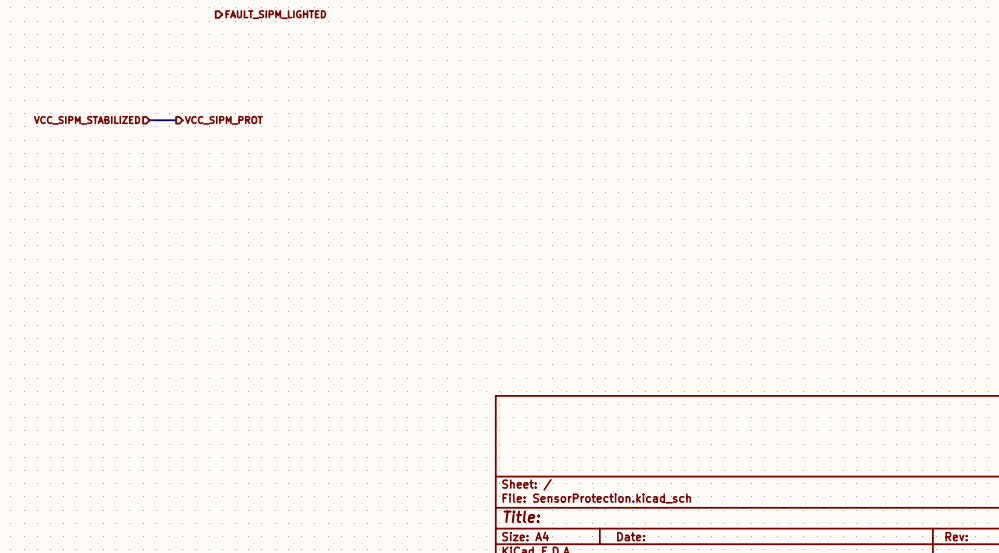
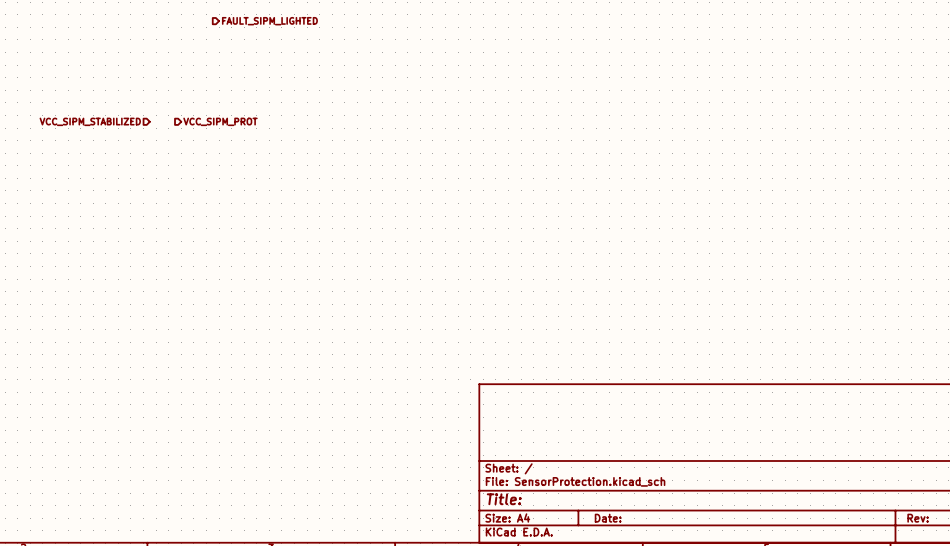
wire: (149, 120) (176, 120) -> none

